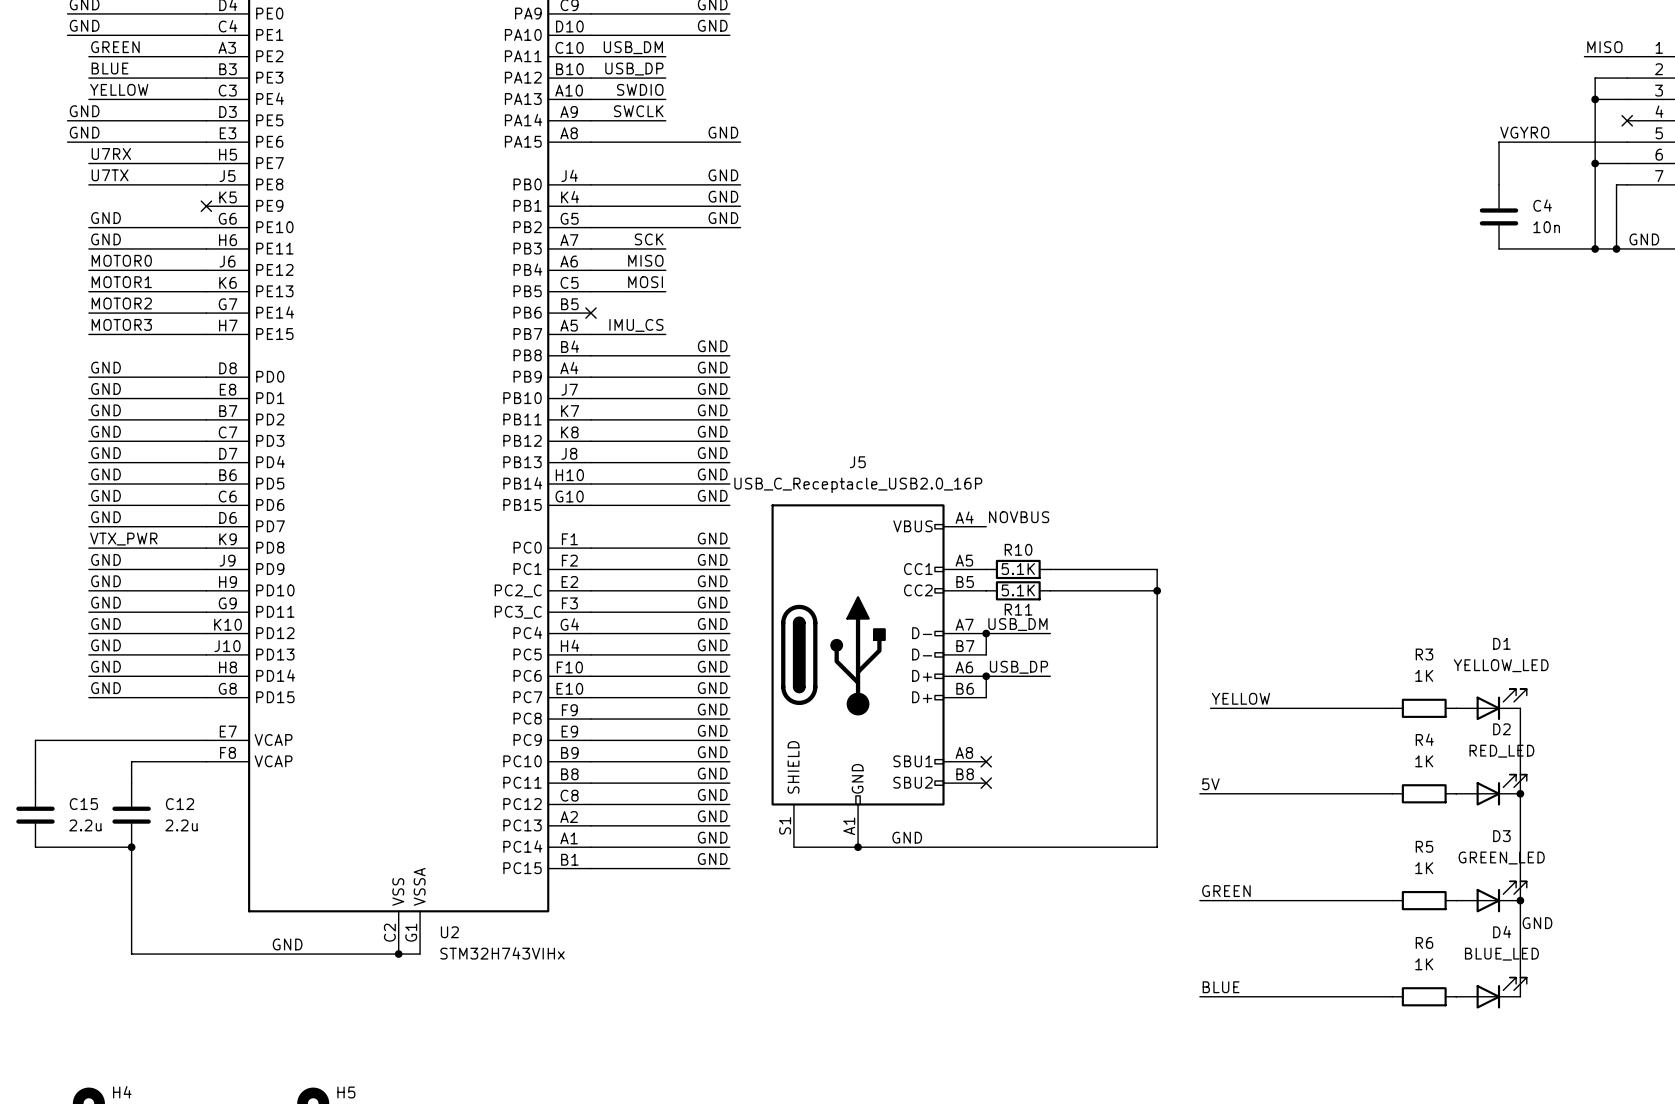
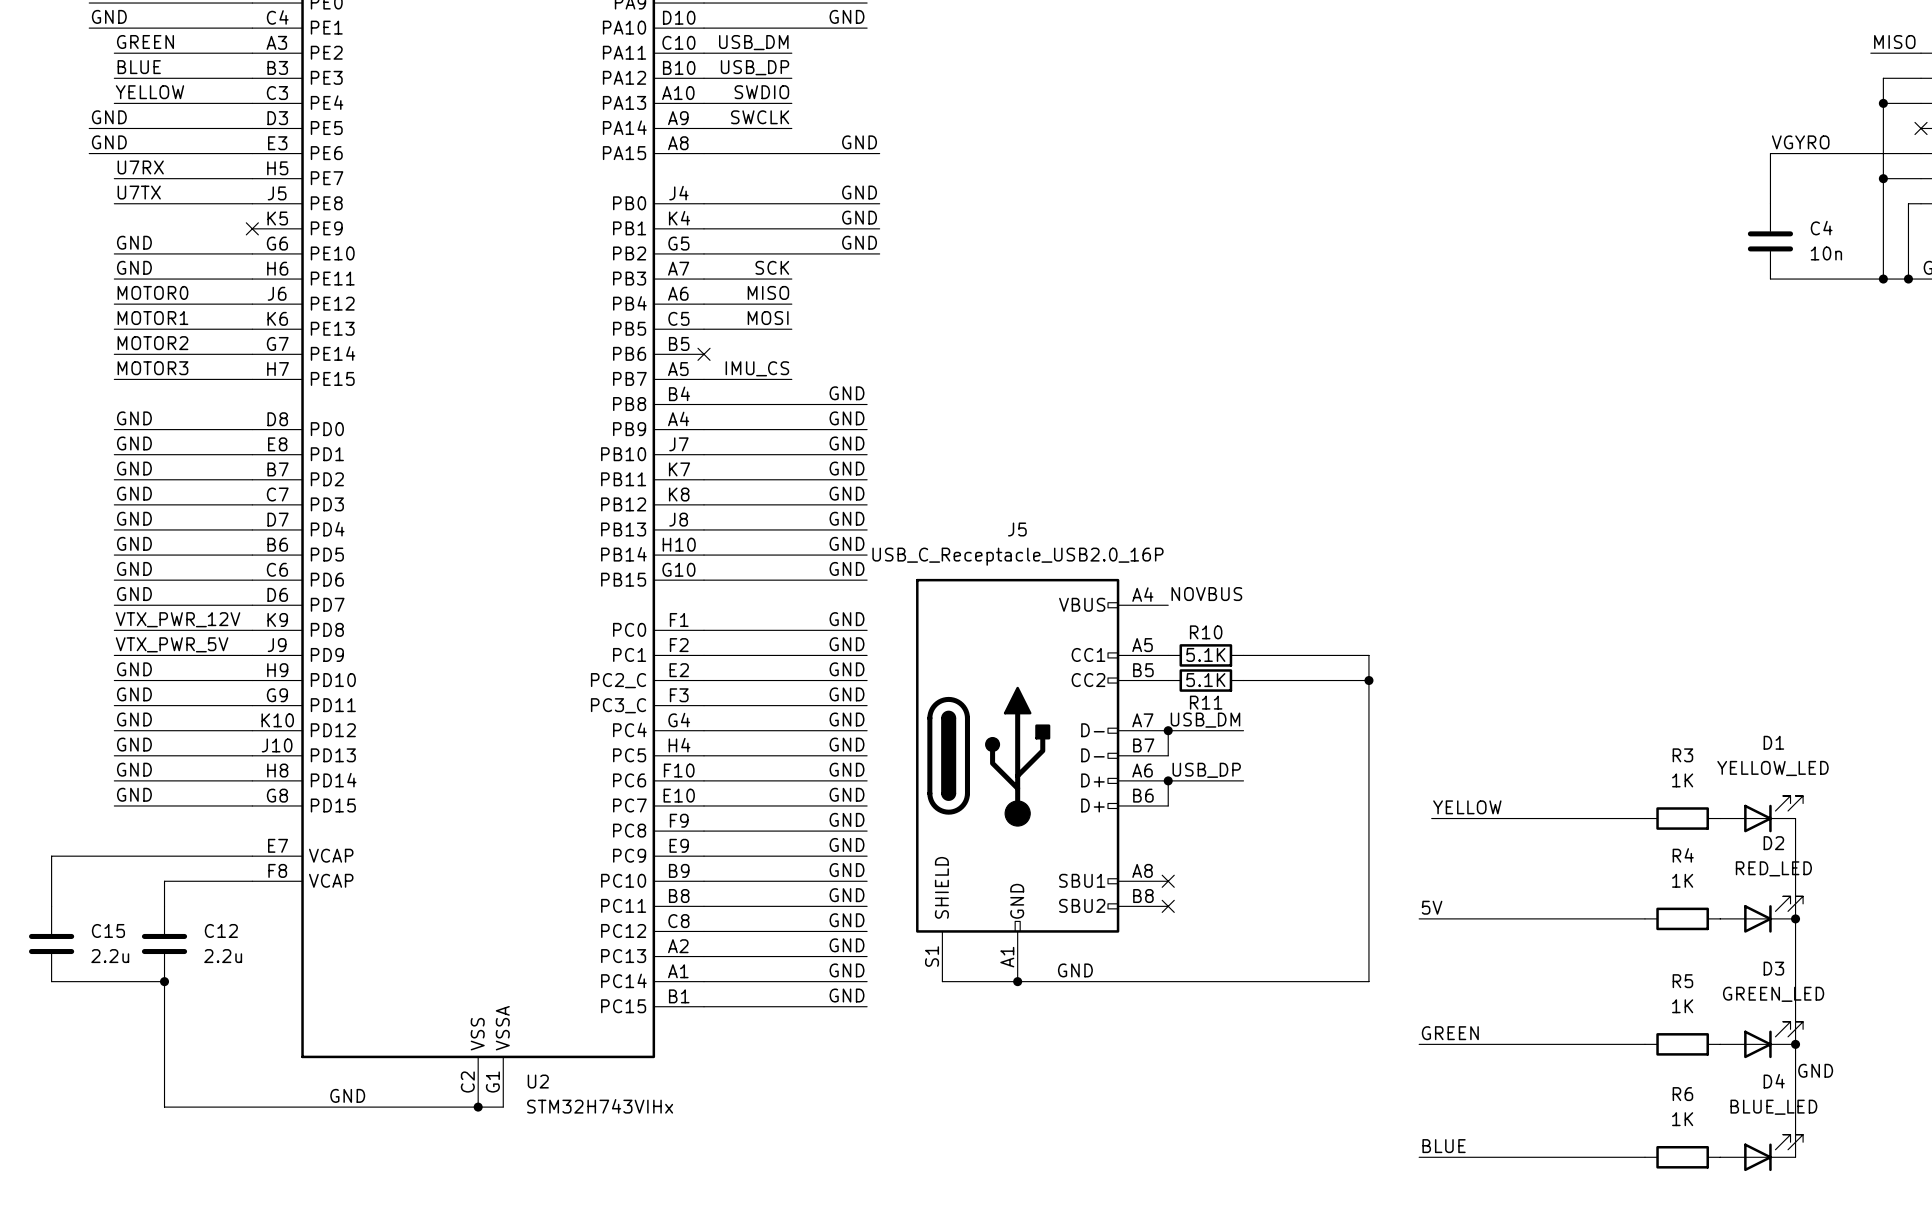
label: VTX_PWR (123, 539) -> VTX_PWR_12V (178, 619)
label: GND (106, 559) -> VTX_PWR_5V (172, 644)

